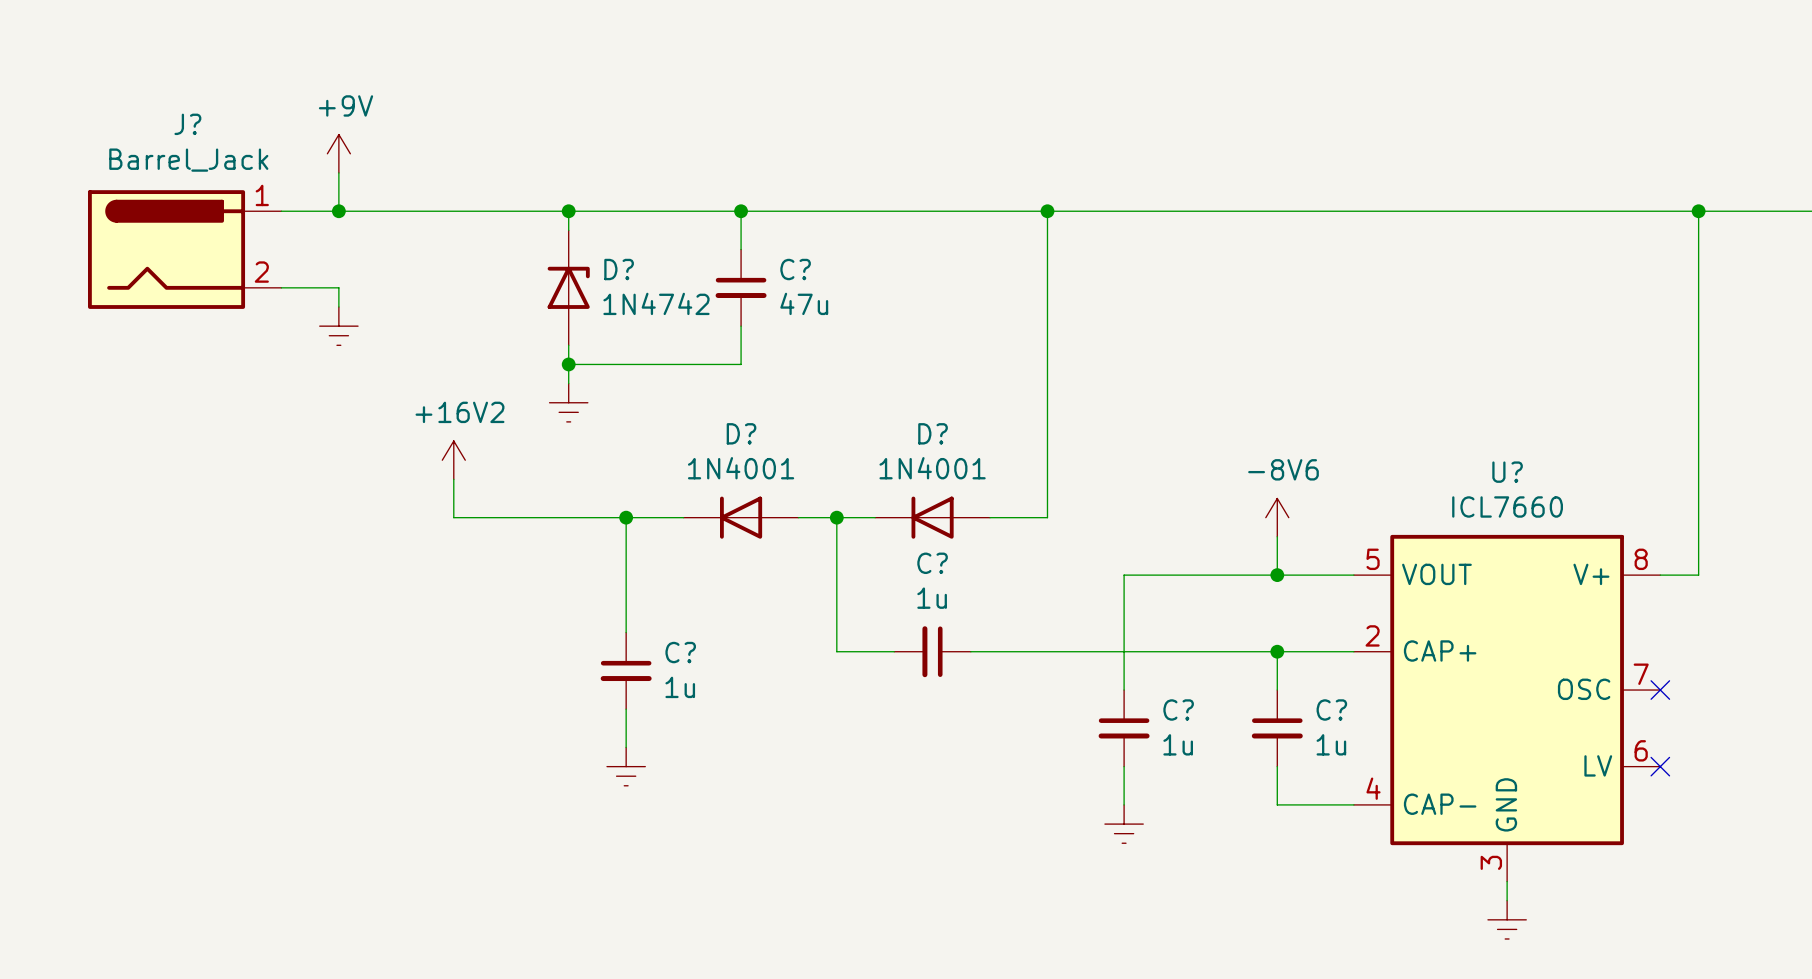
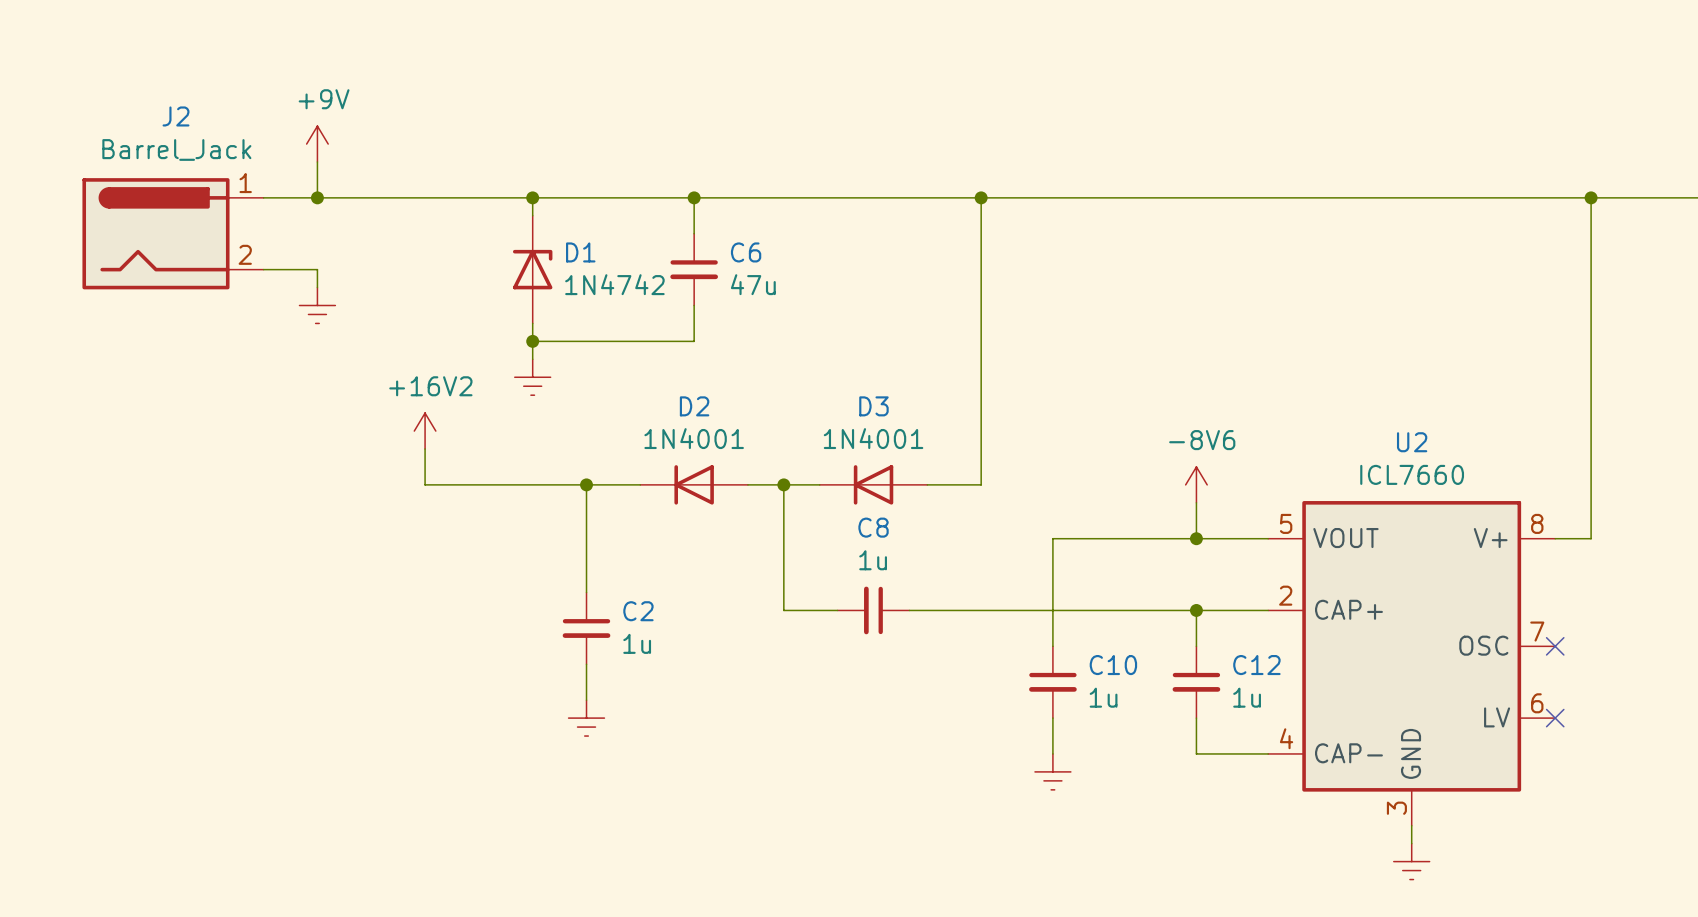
J? name: J? (187, 124) -> J2 (176, 116)
D? name: D? (619, 269) -> D1 (580, 252)
C? name: C? (795, 269) -> C6 (746, 252)
D? name: D? (741, 433) -> D2 (694, 406)
D? name: D? (933, 433) -> D3 (873, 406)
U? name: U? (1507, 472) -> U2 (1412, 442)
C? name: C? (932, 563) -> C8 (873, 527)
C? name: C? (680, 652) -> C2 (638, 611)
C? name: C? (1178, 709) -> C10 (1113, 665)
C? name: C? (1331, 709) -> C12 (1256, 665)

